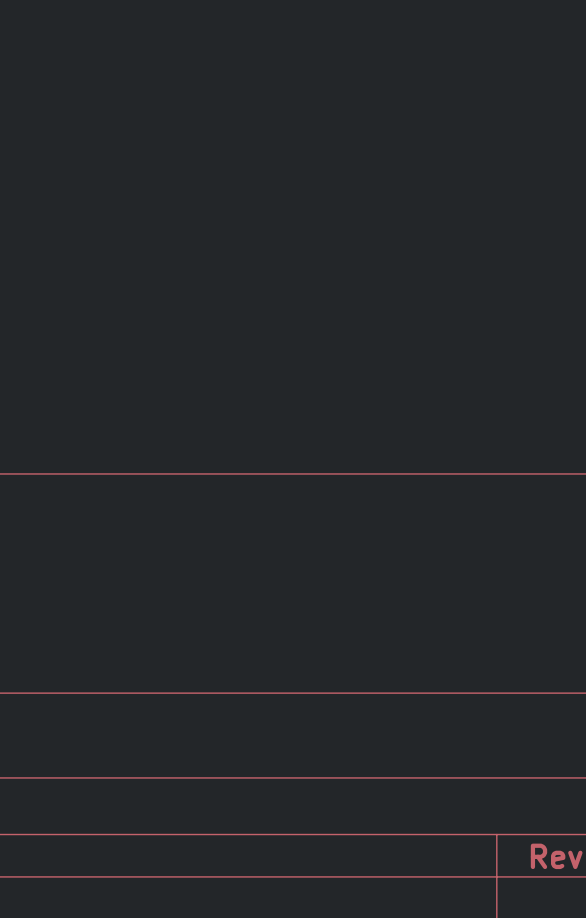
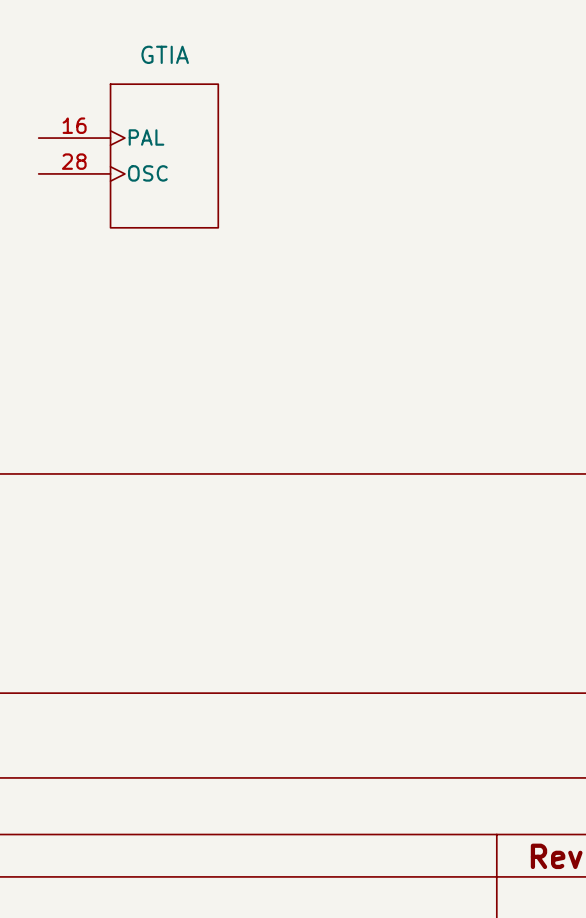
part: none -> GTIA (128, 155)

